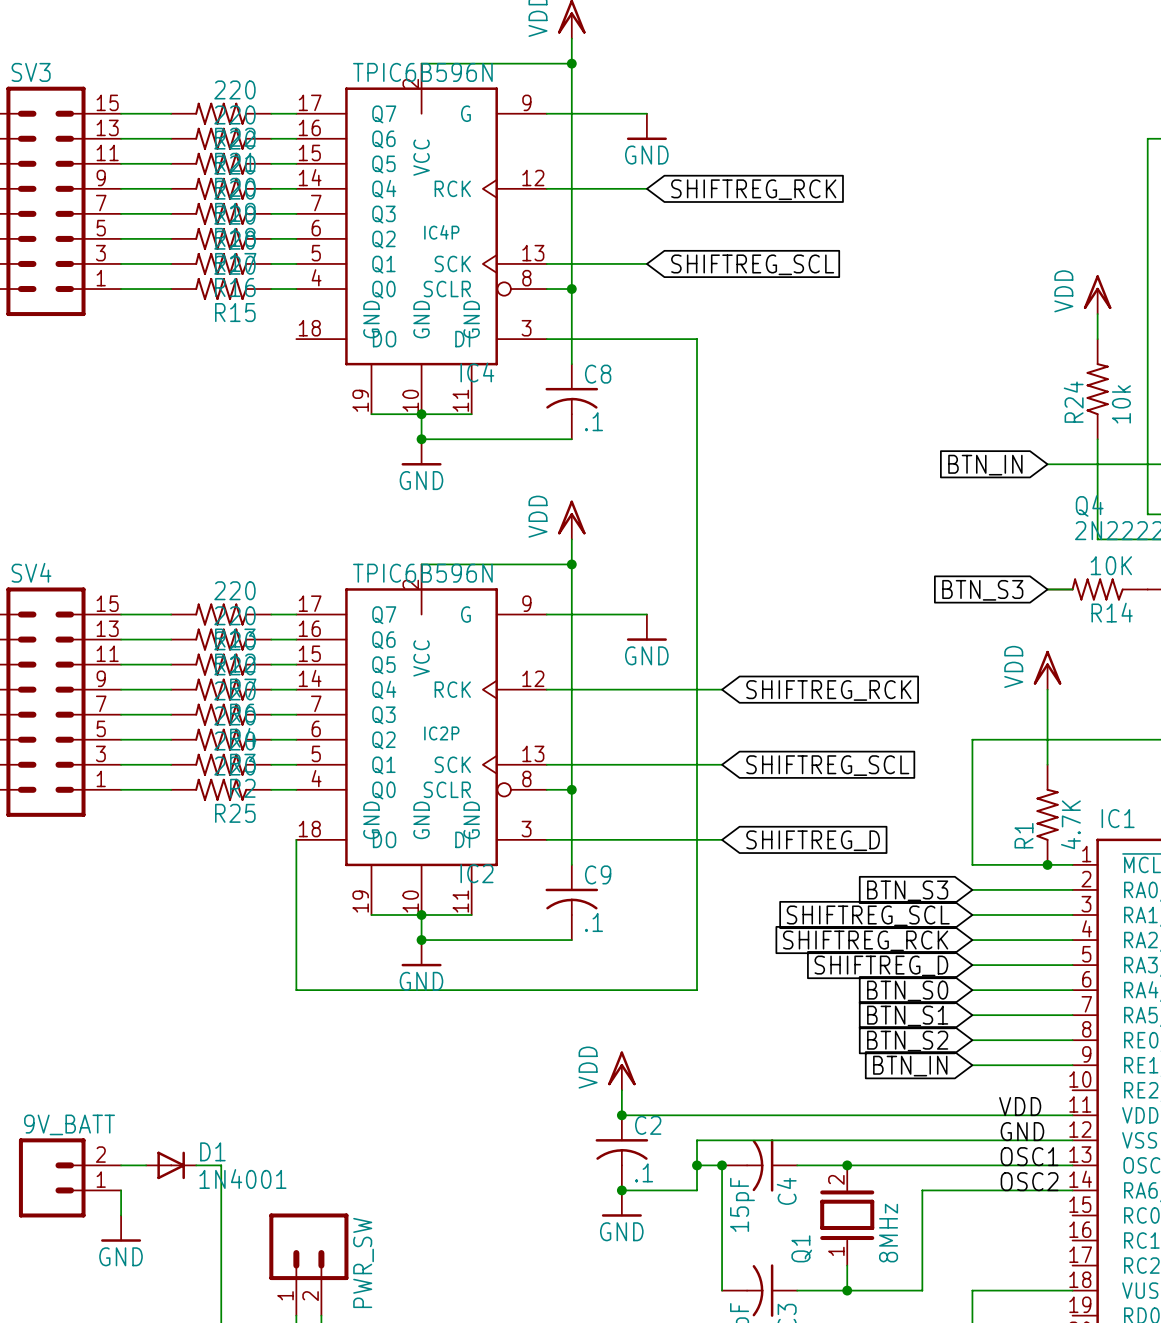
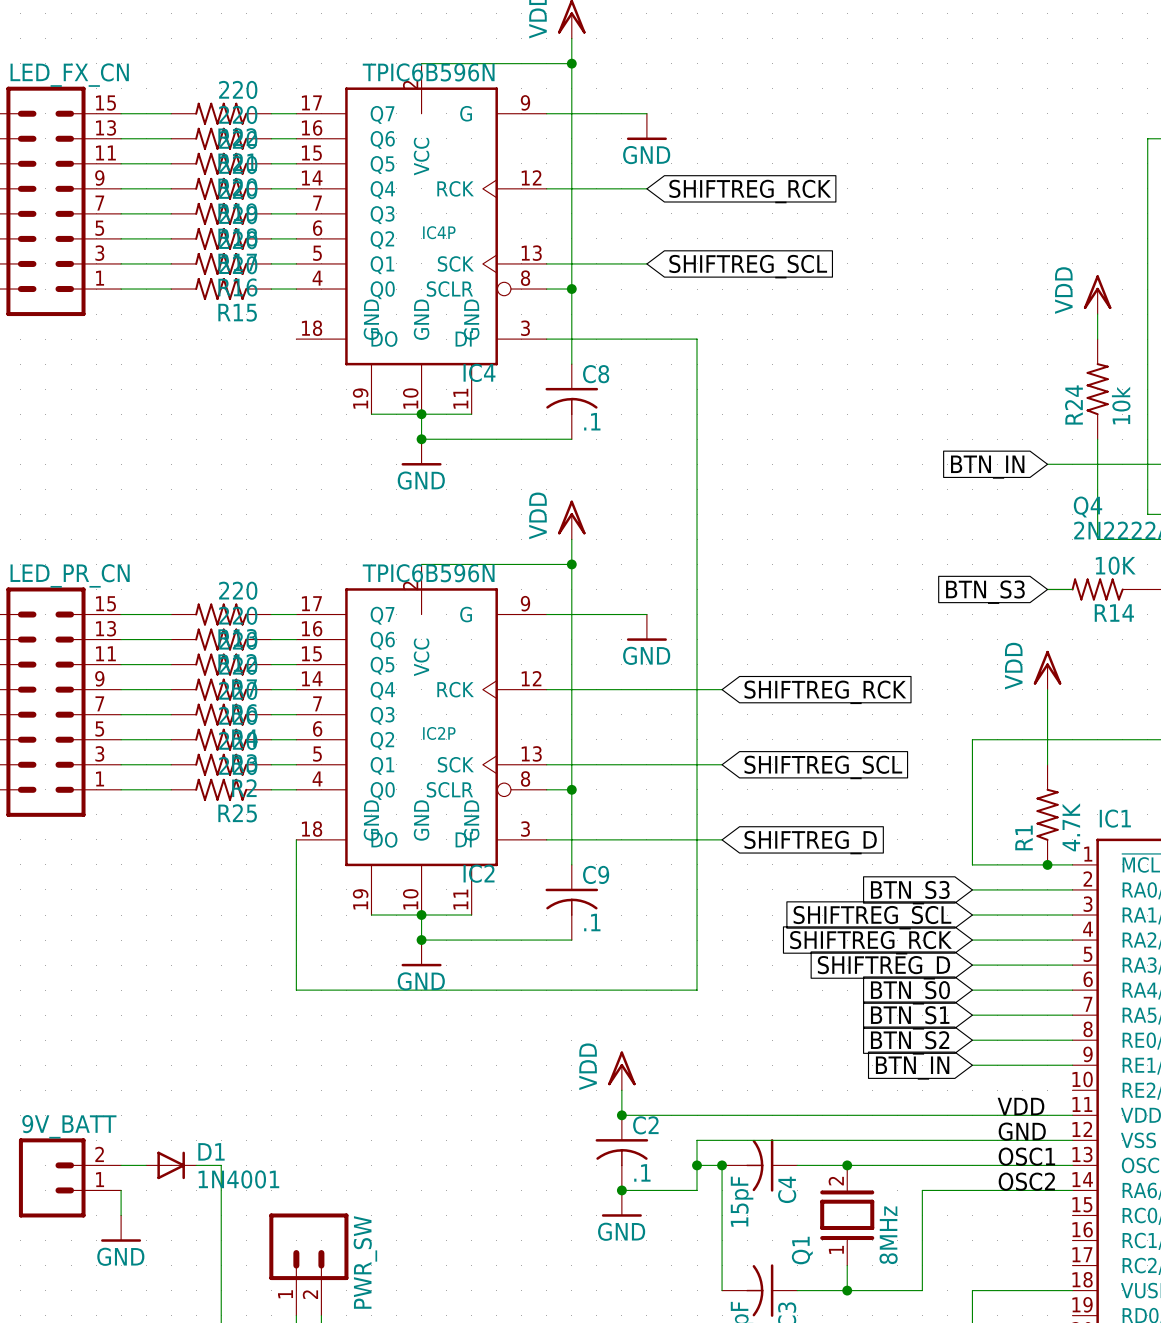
SV3 name: SV3 (31, 72) -> LED_FX_CN (69, 75)
SV4 name: SV4 (31, 572) -> LED_PR_CN (70, 575)

